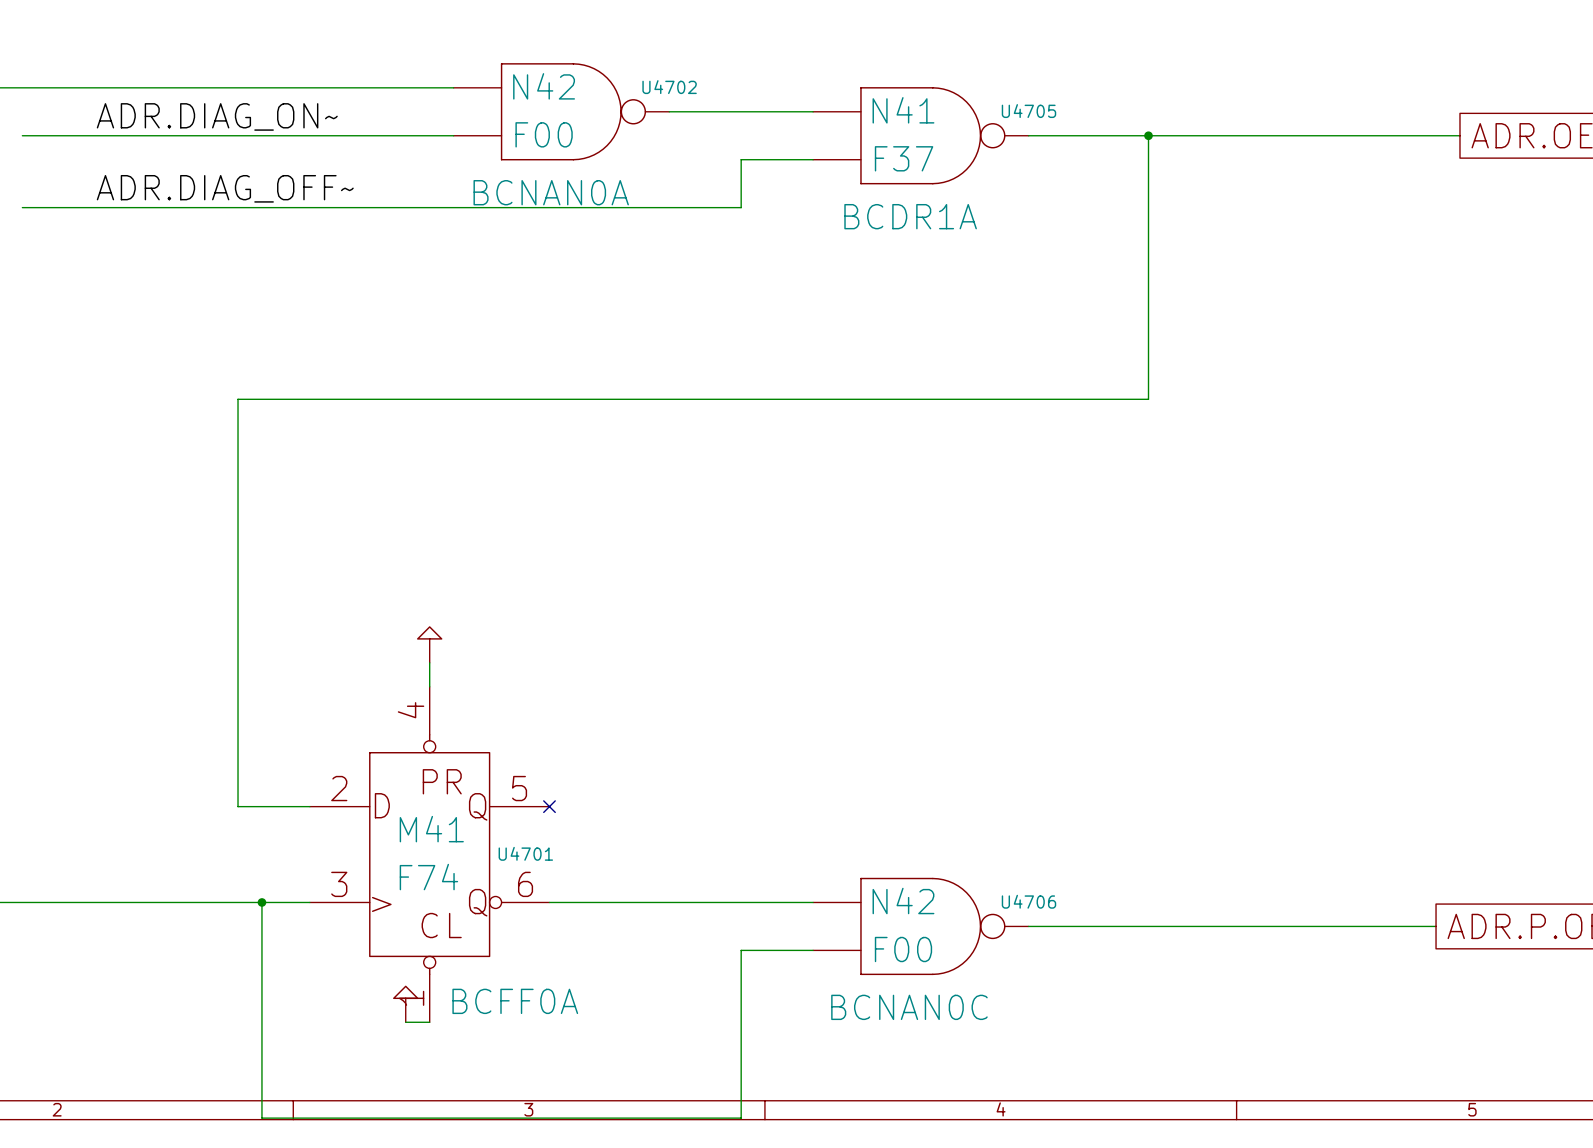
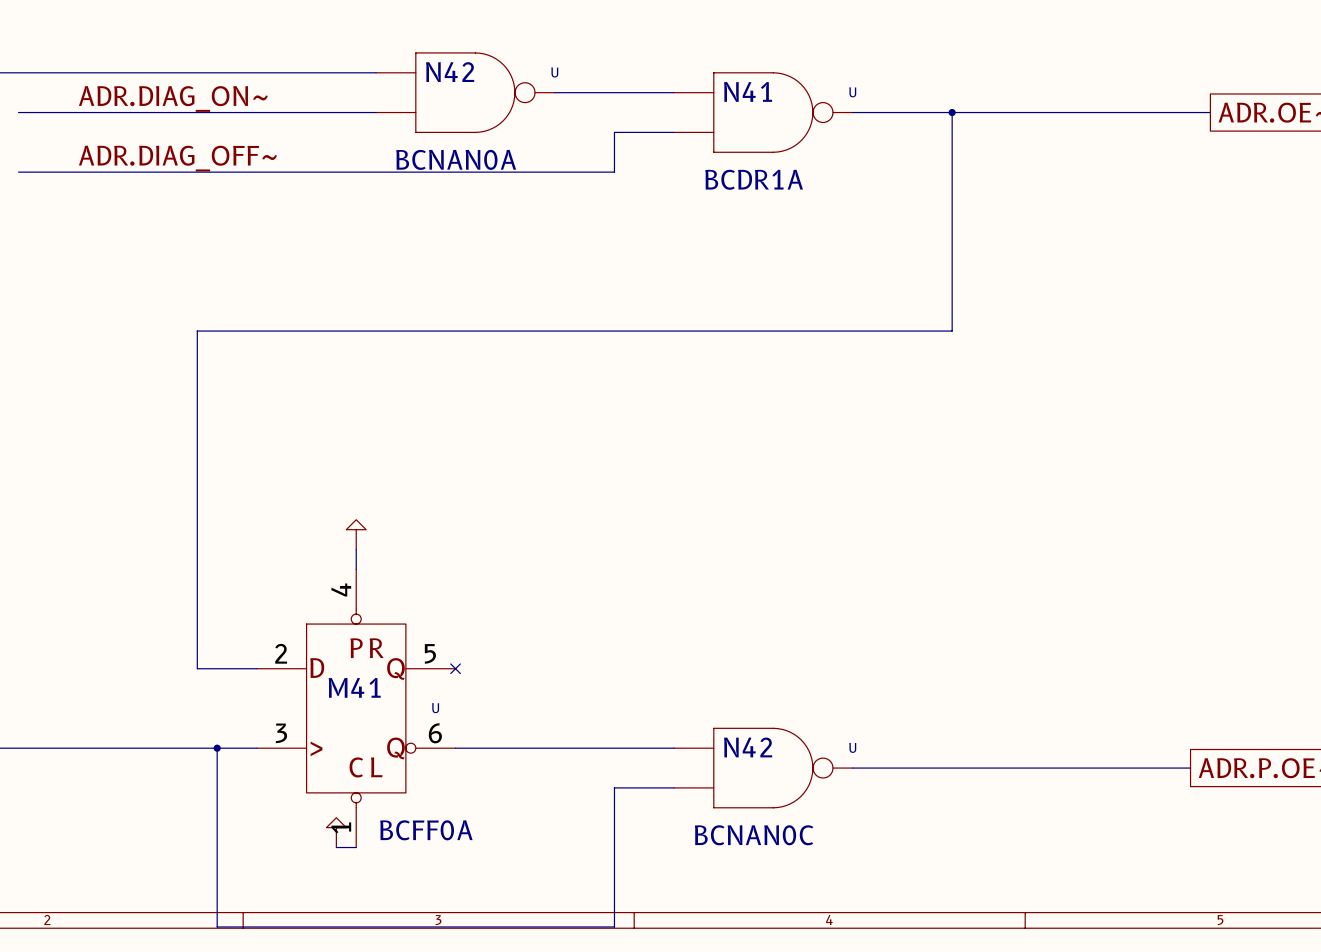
U4702 name: U4702 (669, 87) -> U (554, 72)
U4705 name: U4705 (1028, 111) -> U (852, 92)
U4702 value: F00 (544, 134) -> none
U4705 value: F37 (904, 158) -> none
U4701 name: U4701 (525, 853) -> U (435, 708)
U4701 value: F74 (428, 877) -> none
U4706 name: U4706 (1028, 901) -> U (852, 747)
U4706 value: F00 (903, 949) -> none

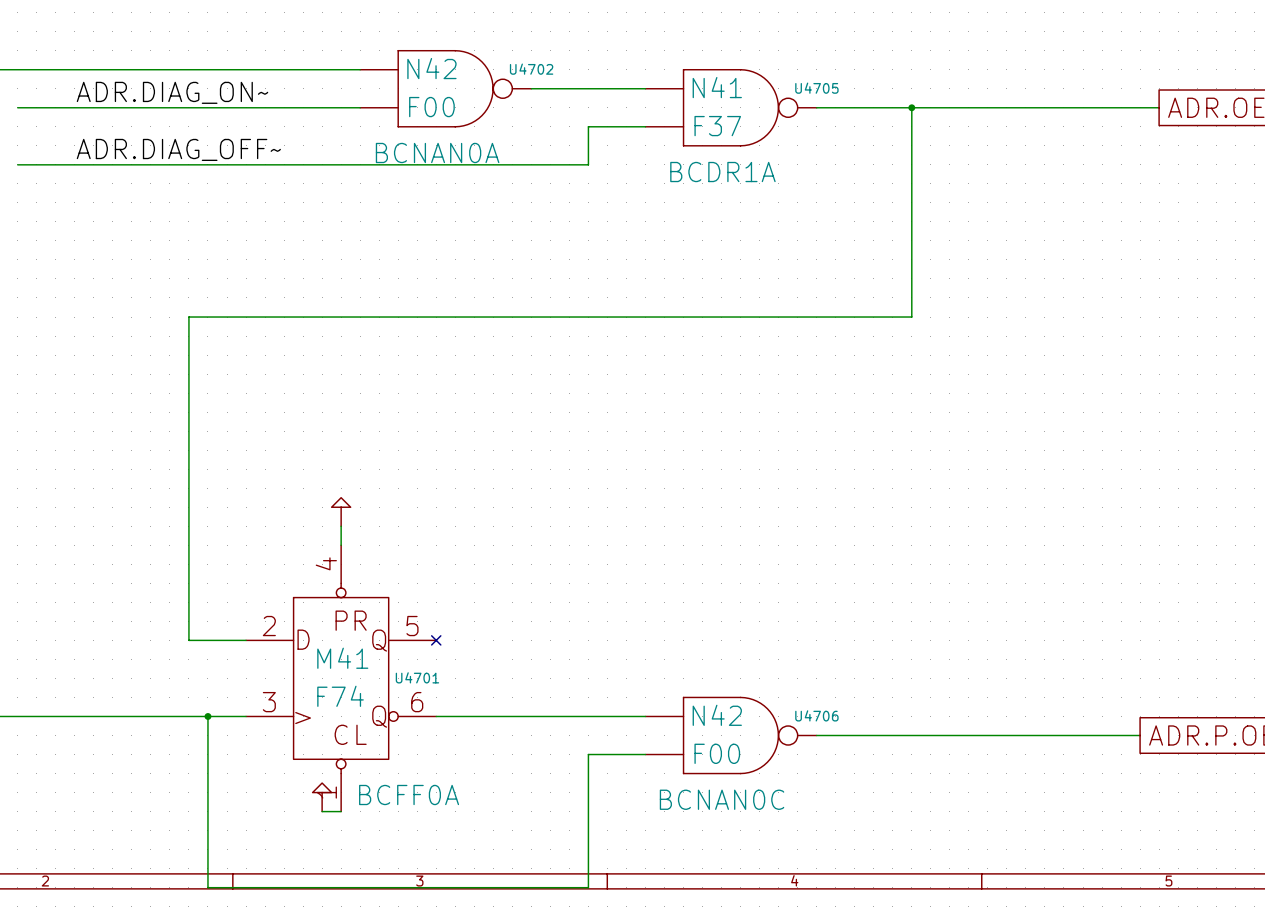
U name: U (554, 72) -> U4702 (531, 69)
U name: U (852, 92) -> U4705 (816, 88)
U value: none -> F00 (431, 107)
U value: none -> F37 (717, 126)
U name: U (435, 708) -> U4701 (417, 677)
U value: none -> F74 (340, 696)
U name: U (852, 747) -> U4706 (816, 715)
U value: none -> F00 (717, 753)

